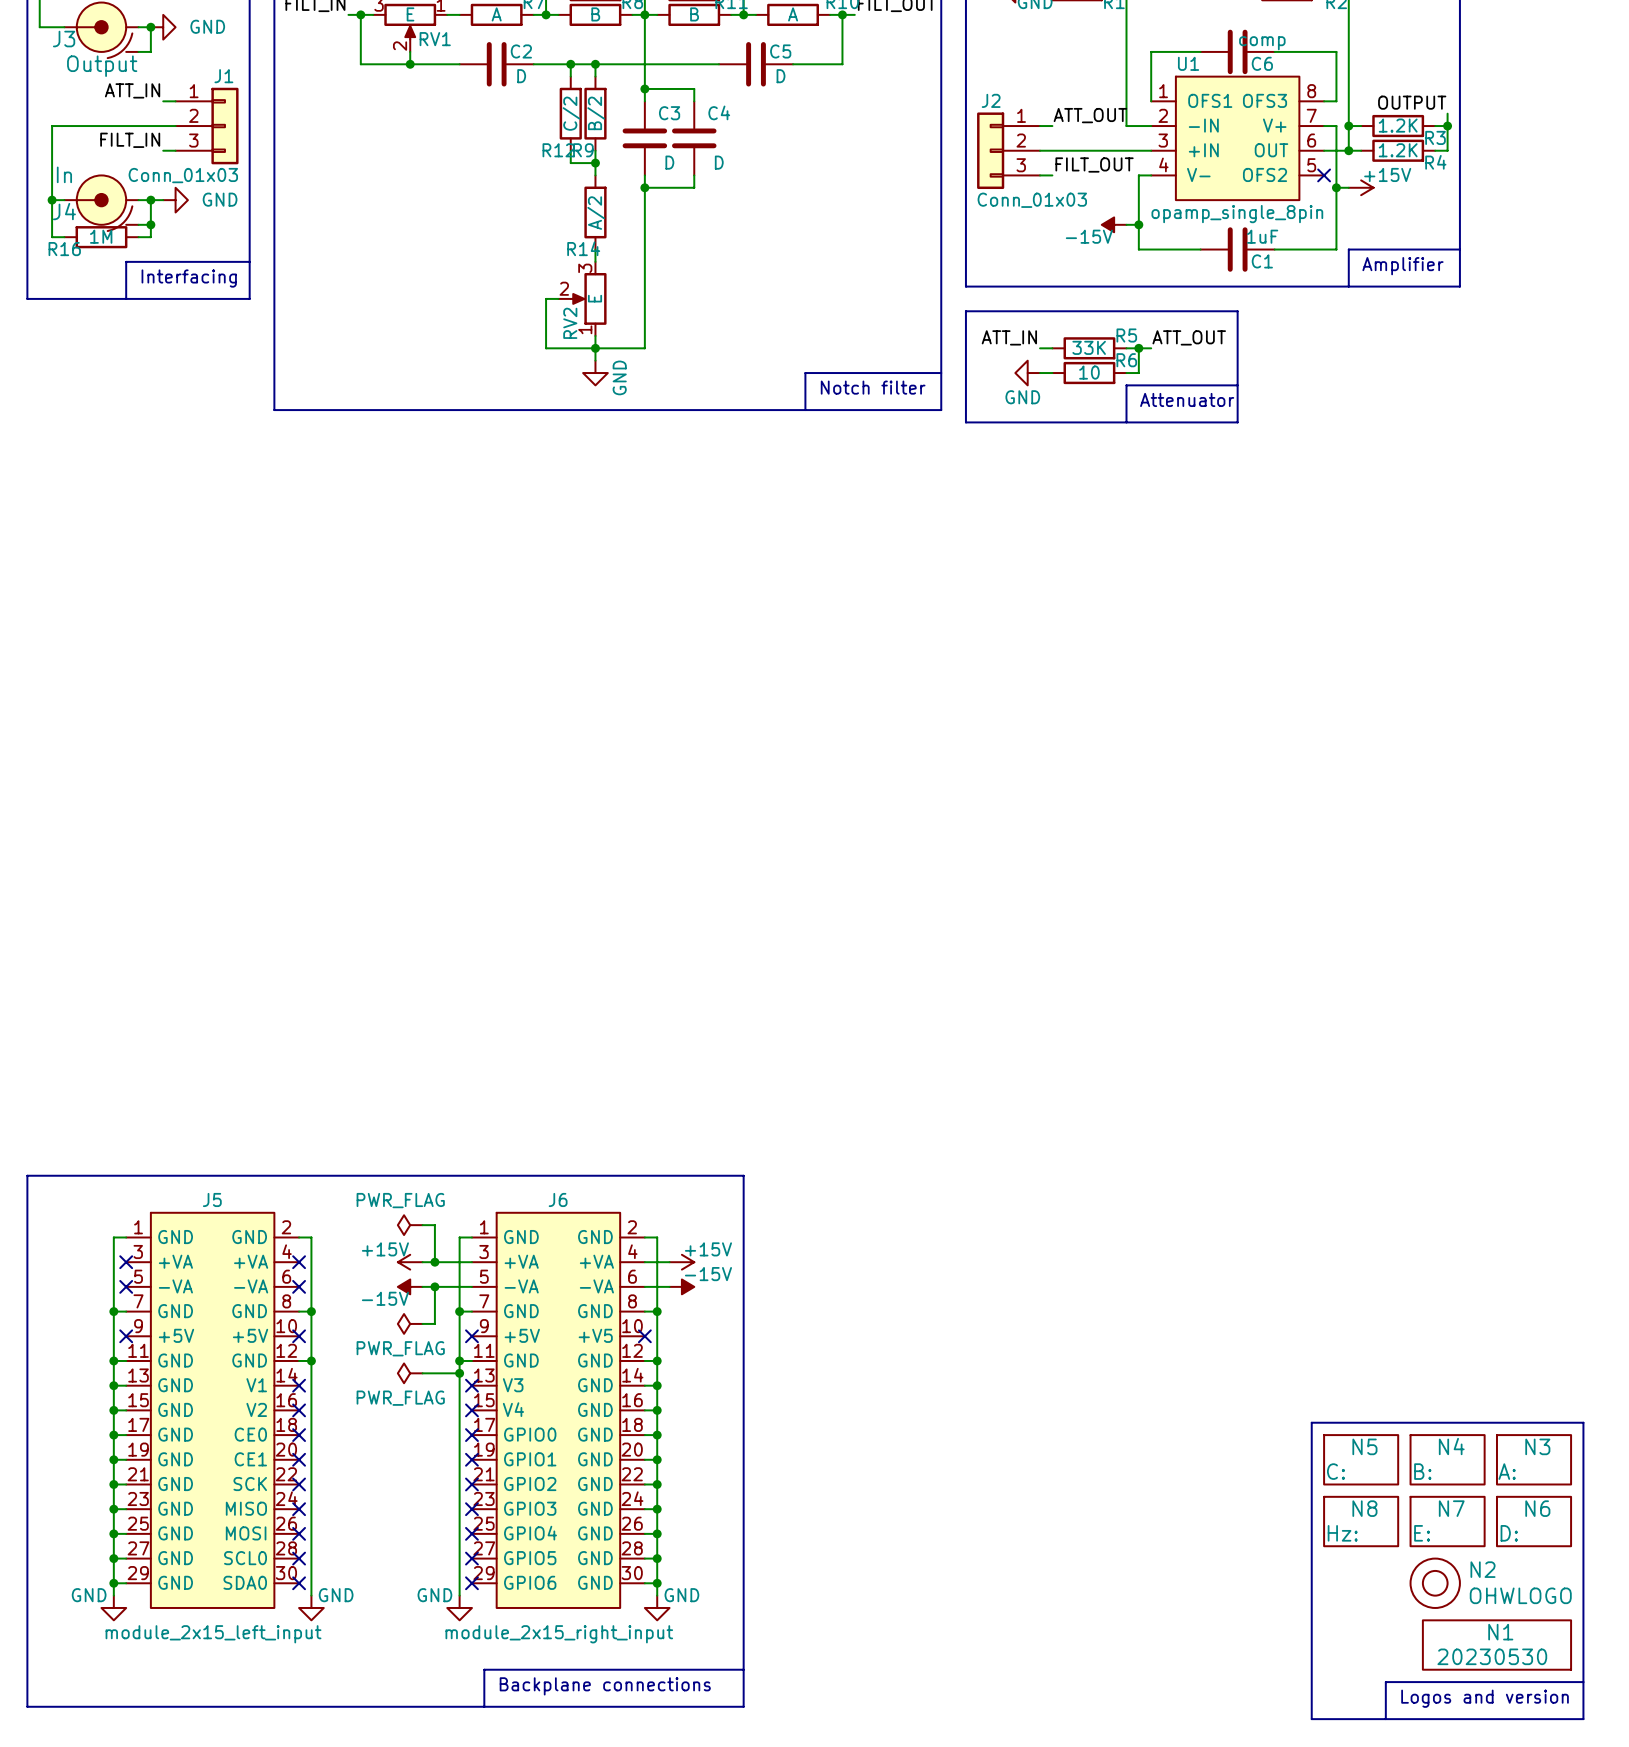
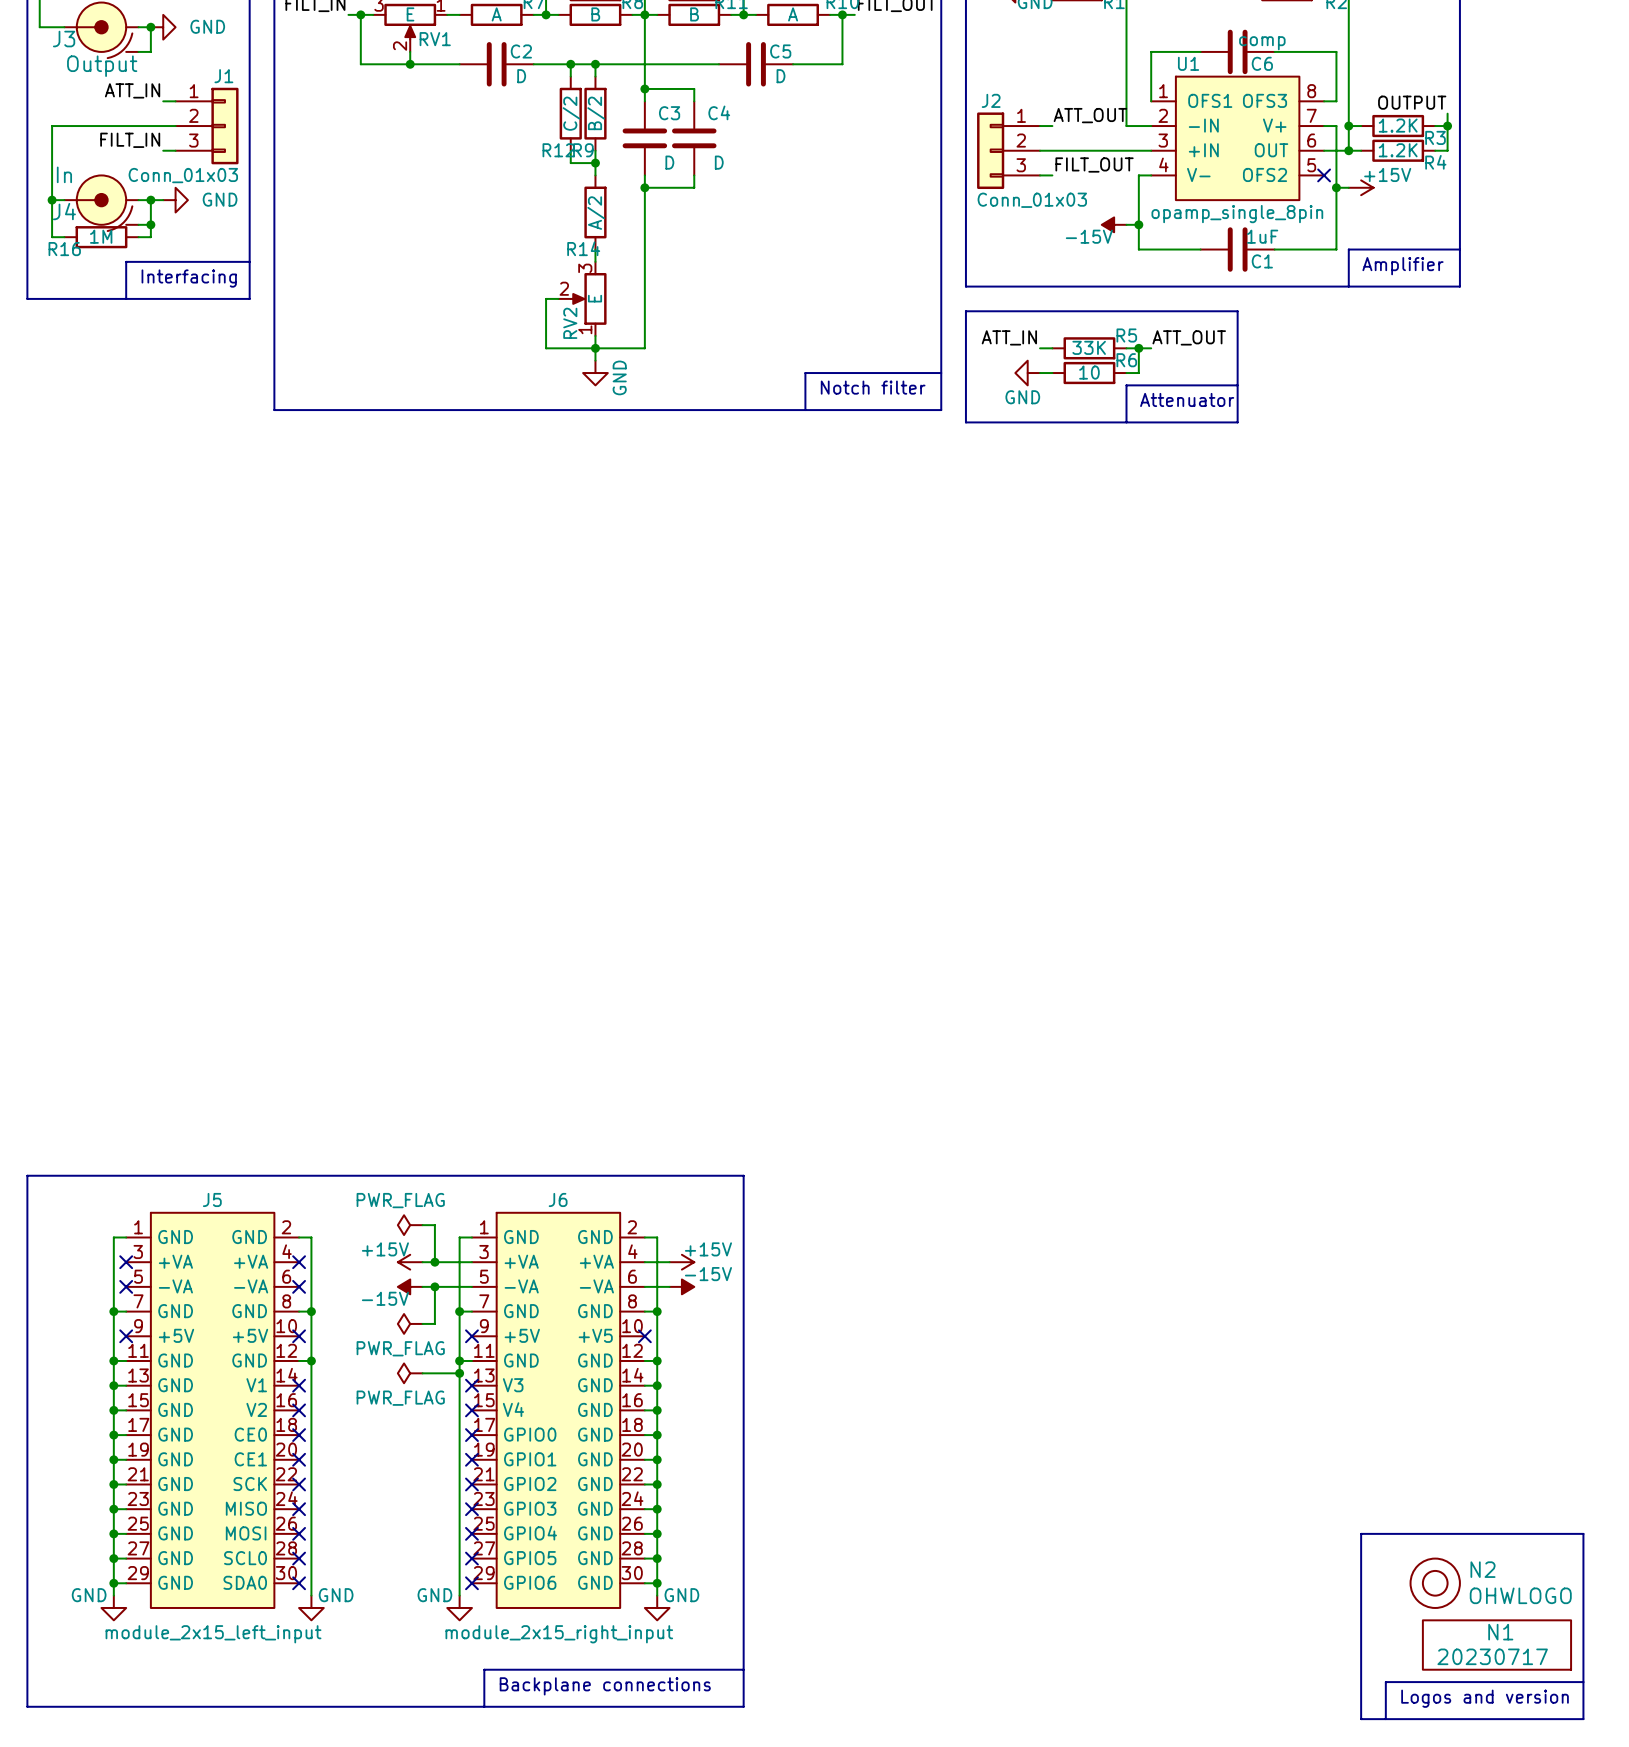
N5: C: (1361, 1459) -> none
N4: B: (1447, 1459) -> none
N3: A: (1534, 1459) -> none
N8: Hz: (1361, 1521) -> none
N7: E: (1447, 1521) -> none
N6: D: (1534, 1521) -> none
line: (1583, 1533) (1583, 1422) (1311, 1422) (1311, 1719) (1361, 1719) -> (1583, 1533) (1361, 1533) (1361, 1719)
N1 value: 20230530 (1492, 1656) -> 20230717 (1492, 1656)

